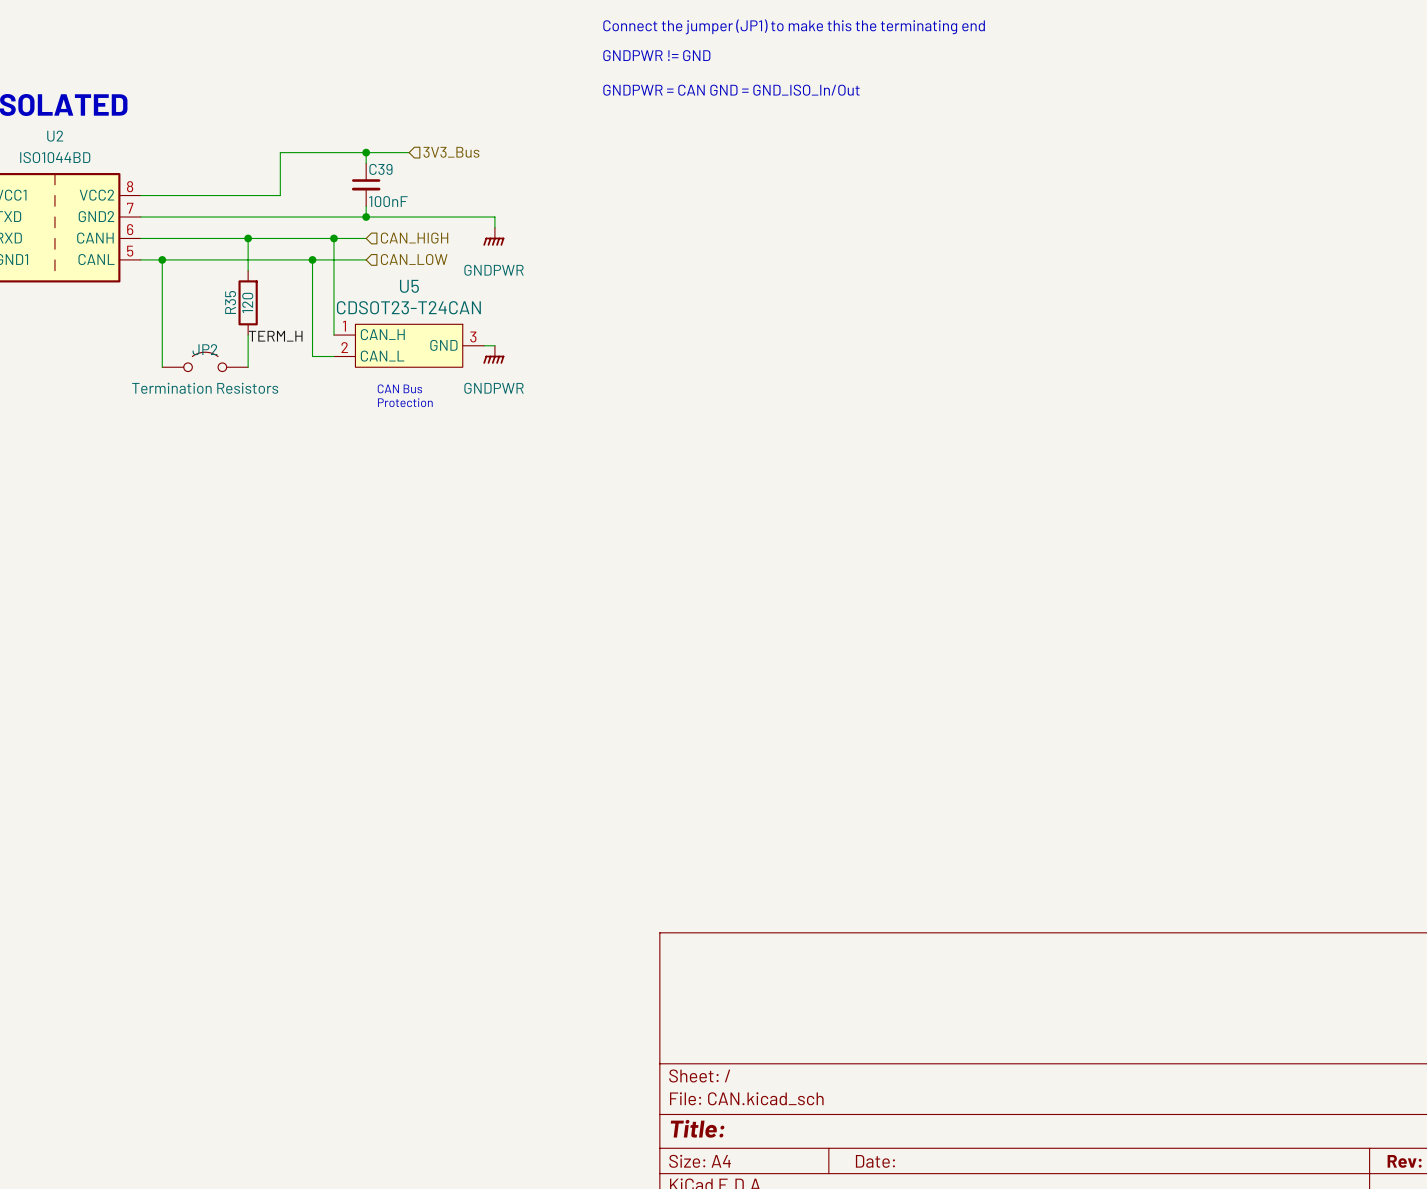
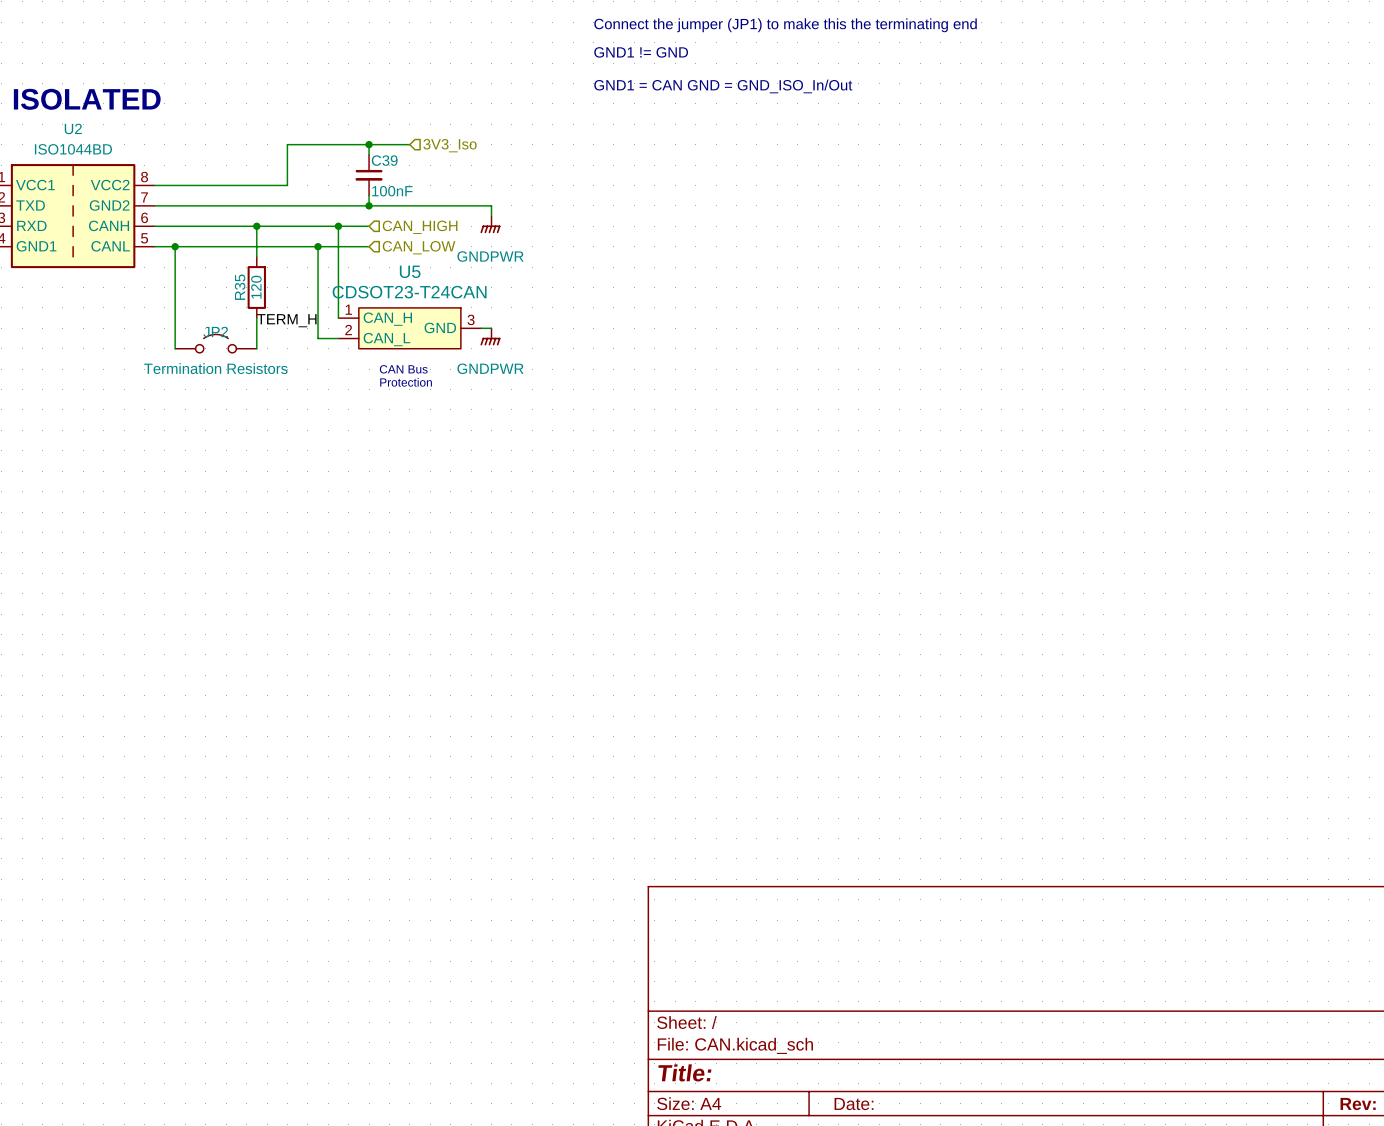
text: GNDPWR != GND (656, 55) -> GND1 != GND (641, 52)
text: GNDPWR = CAN GND = GND_ISO_In/Out (731, 90) -> GND1 = CAN GND = GND_ISO_In/Out (723, 86)
hierarchical label: 3V3_Bus (451, 152) -> 3V3_Iso (450, 145)

